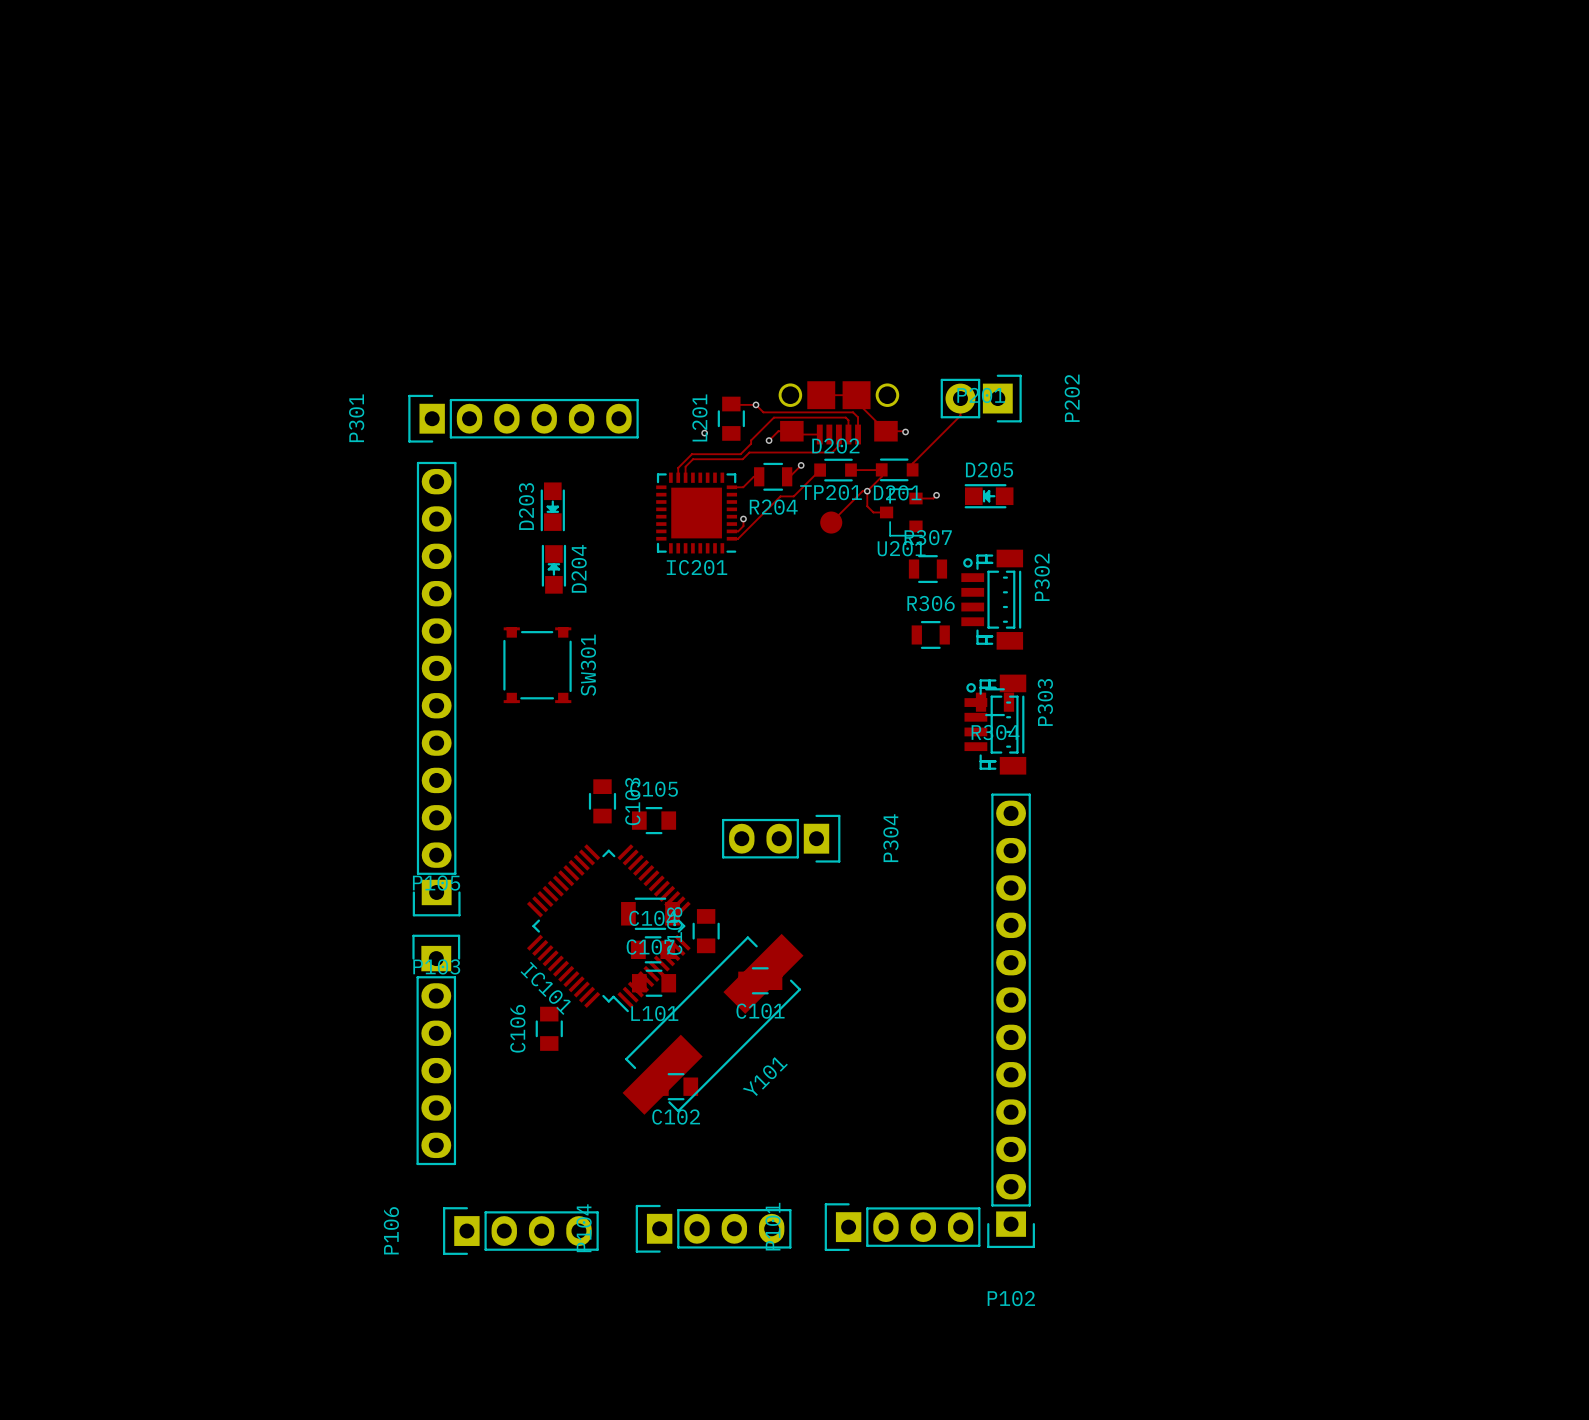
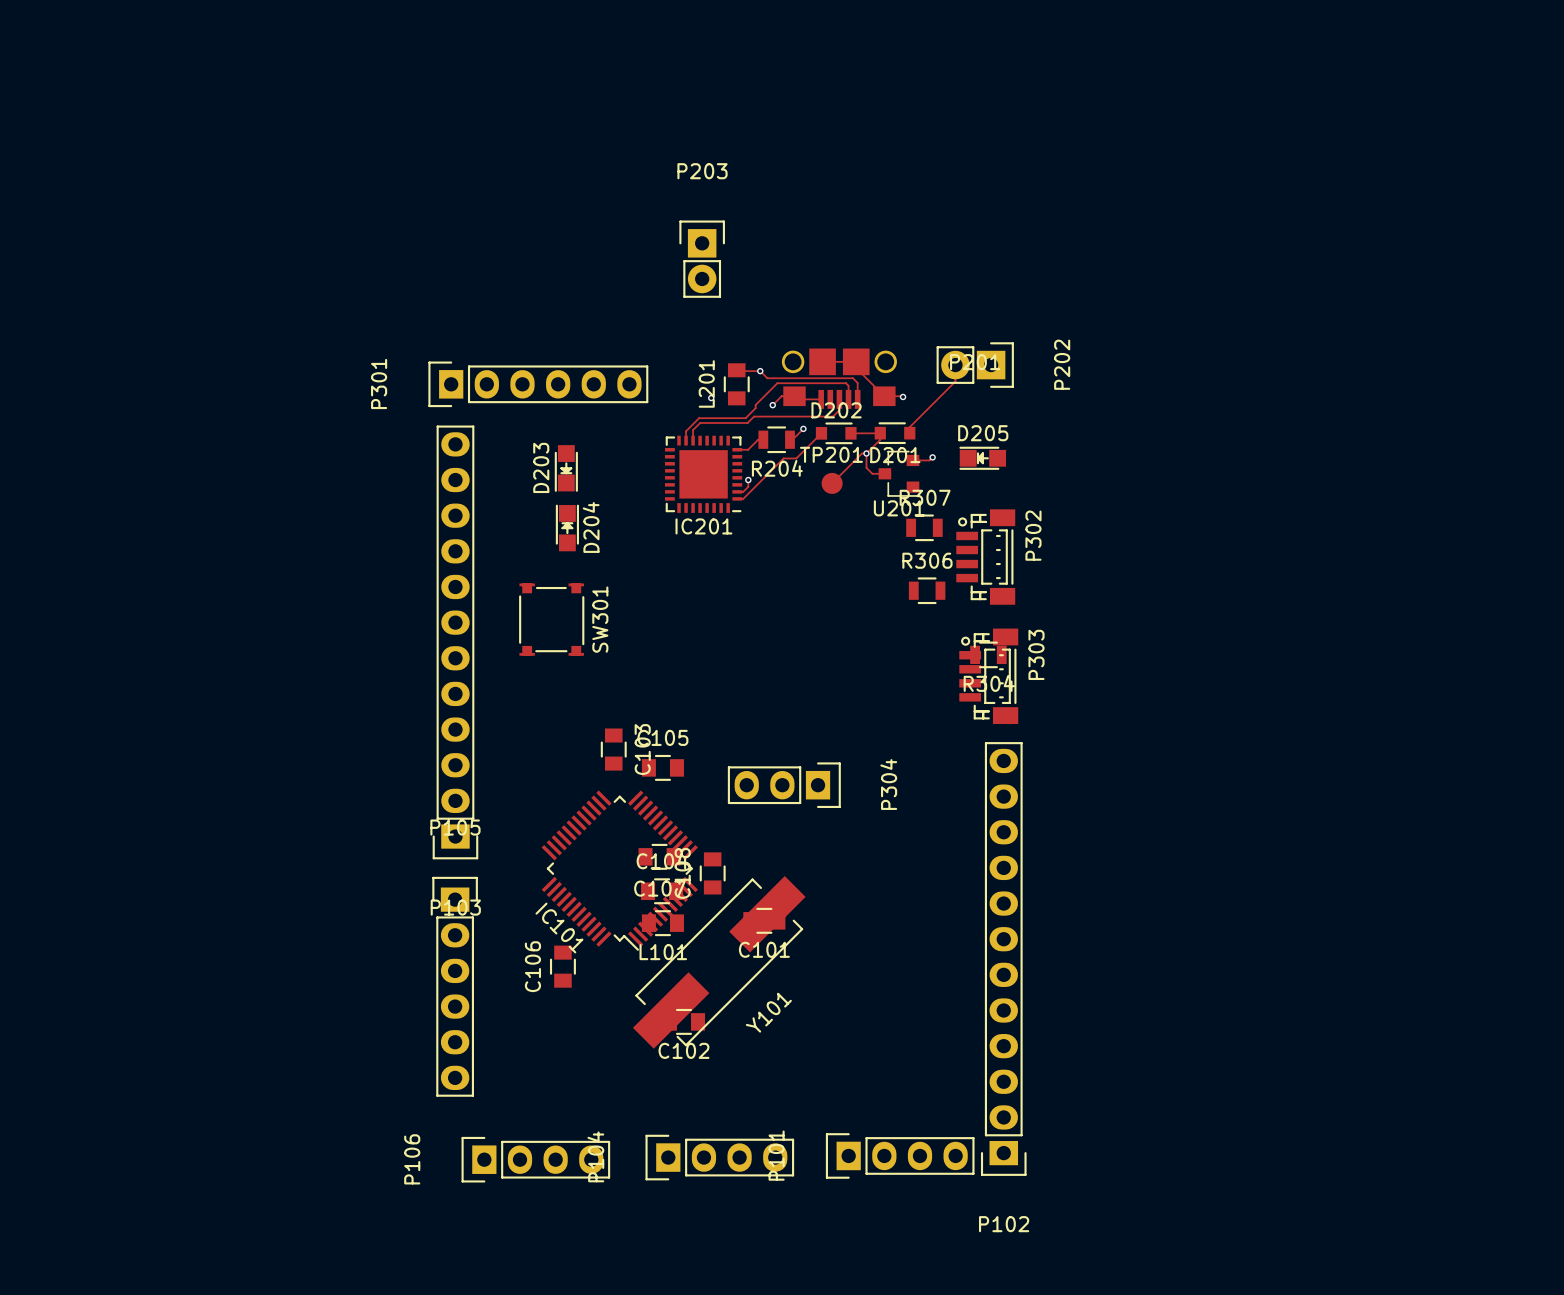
P203: none -> (702, 259)
C107 footprint: [621, 897, 680, 930] -> [638, 843, 681, 870]

